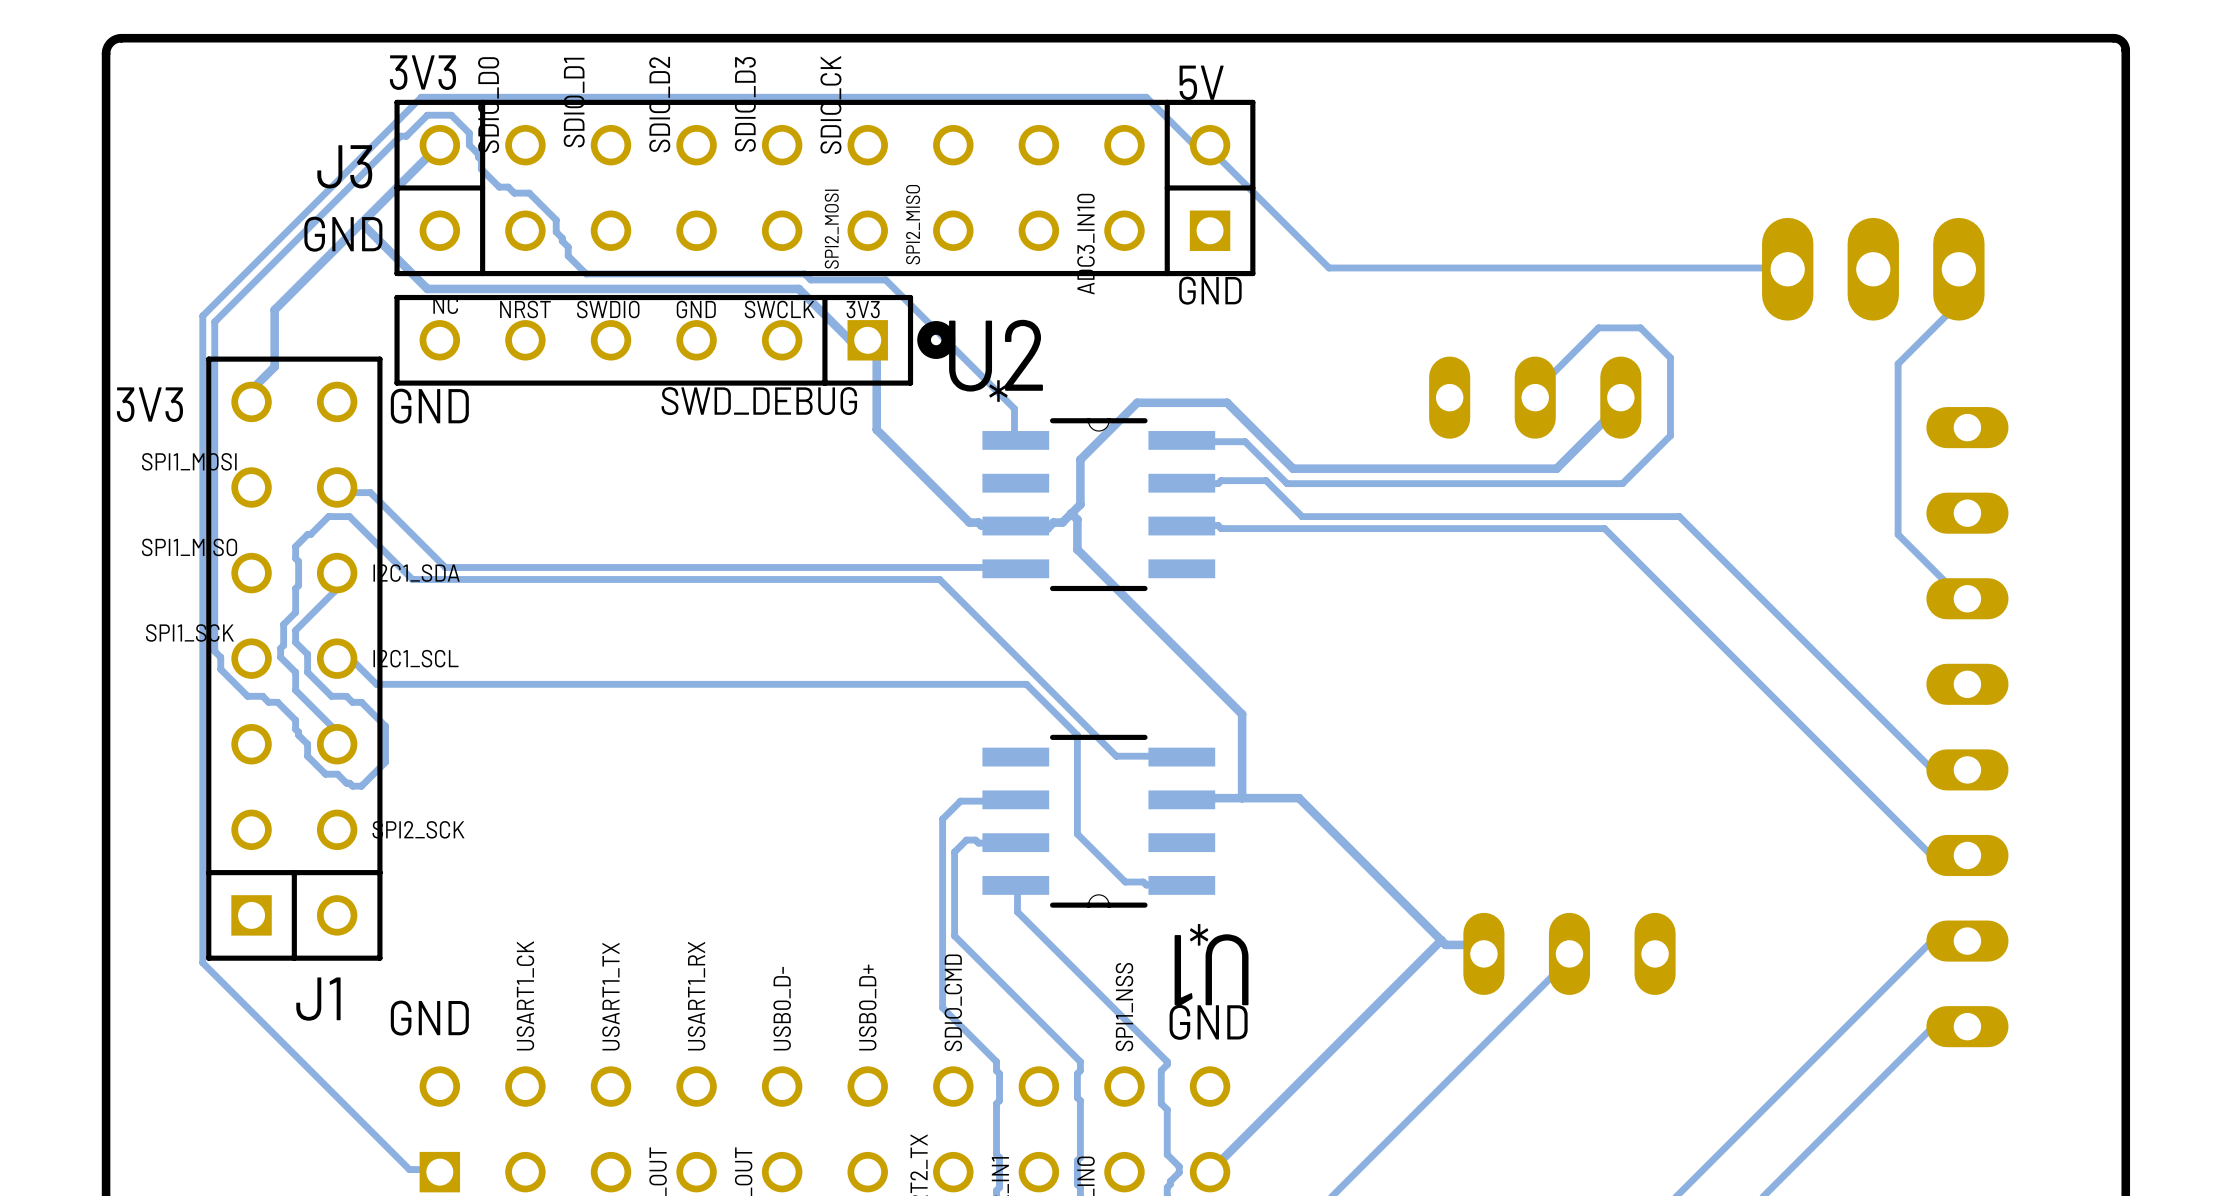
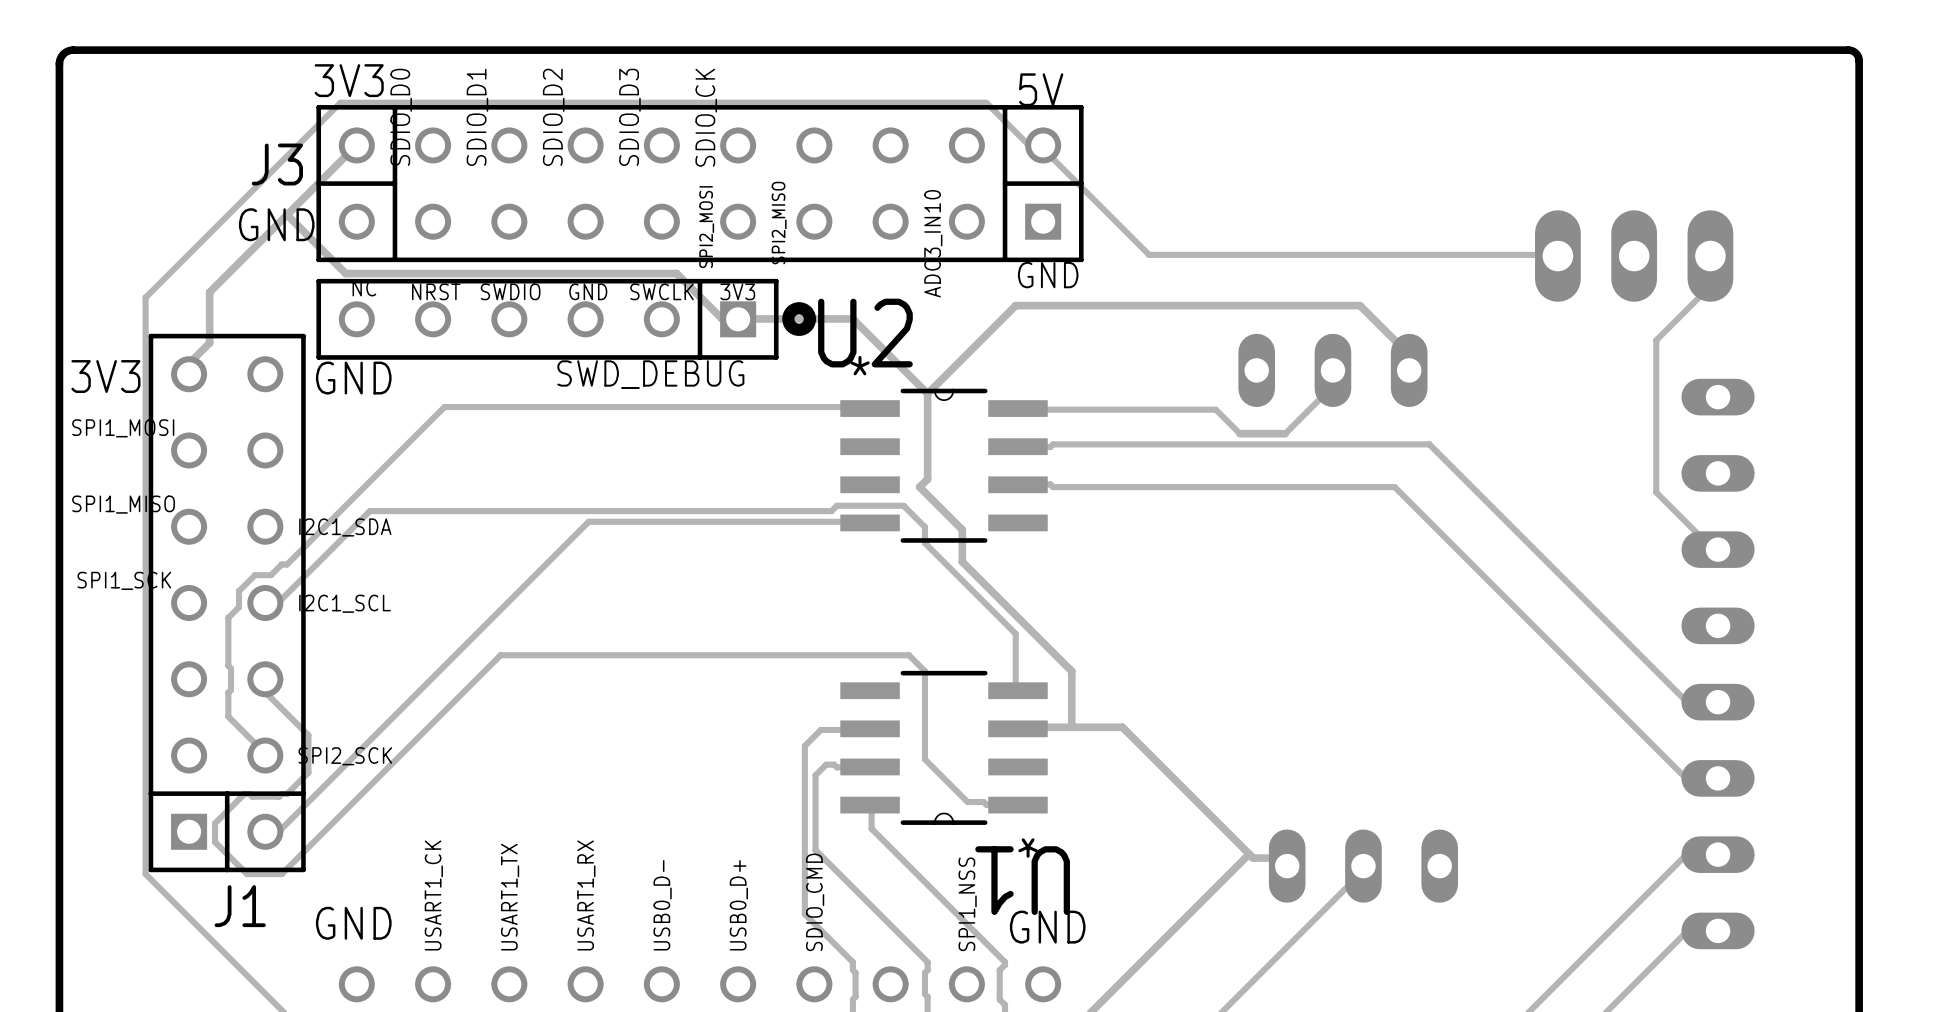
track: (867, 340) (867, 342) (876, 351) (876, 429) (969, 522) (978, 522) (981, 525) (1014, 525) (1017, 528) (1047, 528) (1053, 522) (1062, 522) (1080, 504) -> (738, 318) (852, 318) (927, 393)
track: (1535, 397) (1535, 390) (1598, 327) (1640, 327) (1670, 357) (1670, 435) (1622, 483) (1287, 483) (1245, 441) -> (1239, 433) (1215, 409) (1074, 409)
track: (1620, 397) (1619, 405) (1556, 468) (1481, 468) -> (1332, 370) (1330, 372) (1330, 388) (1285, 433)
track: none -> (1409, 370) (1408, 353) (1360, 305) (1015, 305) (927, 393)
track: (1014, 438) (1014, 408) (885, 279) (810, 279) (804, 273) (586, 273) (568, 256) (568, 247) (556, 232) (556, 220) (529, 193) (514, 193) (508, 187) (499, 187) (481, 169) (481, 160) (478, 154) (469, 145) (469, 133) (451, 115) (427, 115) (406, 136) (400, 136) (214, 321) (214, 651) (220, 657) (220, 669) (247, 696) (262, 696) (268, 702) (277, 702) (295, 720) -> (868, 407) (444, 407) (287, 564) (281, 564) (271, 575) (255, 575) (239, 591) (239, 599)
track: (1080, 459) (1137, 402) (1227, 402) (1293, 468) (1430, 468) -> (927, 425) (927, 393)
track: (1266, 480) (1302, 516) (1679, 516) -> (1093, 444) (1429, 444) (1461, 476)
track: (337, 487) (340, 492) (370, 492) (445, 567) (699, 567) -> (265, 831) (279, 831) (588, 521)
track: (1071, 513) (1077, 519) (1077, 549) (1242, 714) (1242, 735) -> (927, 465) (927, 479) (919, 487) (962, 529) (962, 561) (1071, 671)
track: (337, 573) (334, 573) (334, 591) (295, 630) (295, 642) (307, 654) -> none
track: (337, 658) (337, 660) (352, 660) (376, 684) (1026, 684) (1059, 717) -> (265, 679) (265, 692) (308, 735) (308, 772) (287, 794) (281, 794) (279, 796) (252, 796) (249, 794) (244, 794) (215, 823) (215, 842) (247, 874) (281, 874) (500, 655) (908, 655)
track: (307, 663) (307, 672) (331, 696) (346, 696) (352, 702) (361, 702) (385, 726) (385, 762) (361, 786) (352, 786) (337, 774) (325, 774) (307, 756) (307, 744) (298, 735) -> (239, 607) (228, 617)
track: (295, 675) (295, 672) (280, 657) (280, 648) (283, 645) (283, 624) (295, 612) (295, 588) (298, 585) (298, 561) (295, 558) (295, 546) (328, 516) (349, 516) (412, 579) (939, 579) (1116, 756) (1179, 756) -> (265, 603) (279, 601) (369, 511) (831, 511) (836, 505) (903, 505) (924, 527) (924, 543) (1015, 633) (1015, 689)
track: (295, 690) (334, 729) (334, 744) (337, 744) -> (228, 631) (228, 657)
track: none -> (231, 671) (228, 716) (265, 755)

